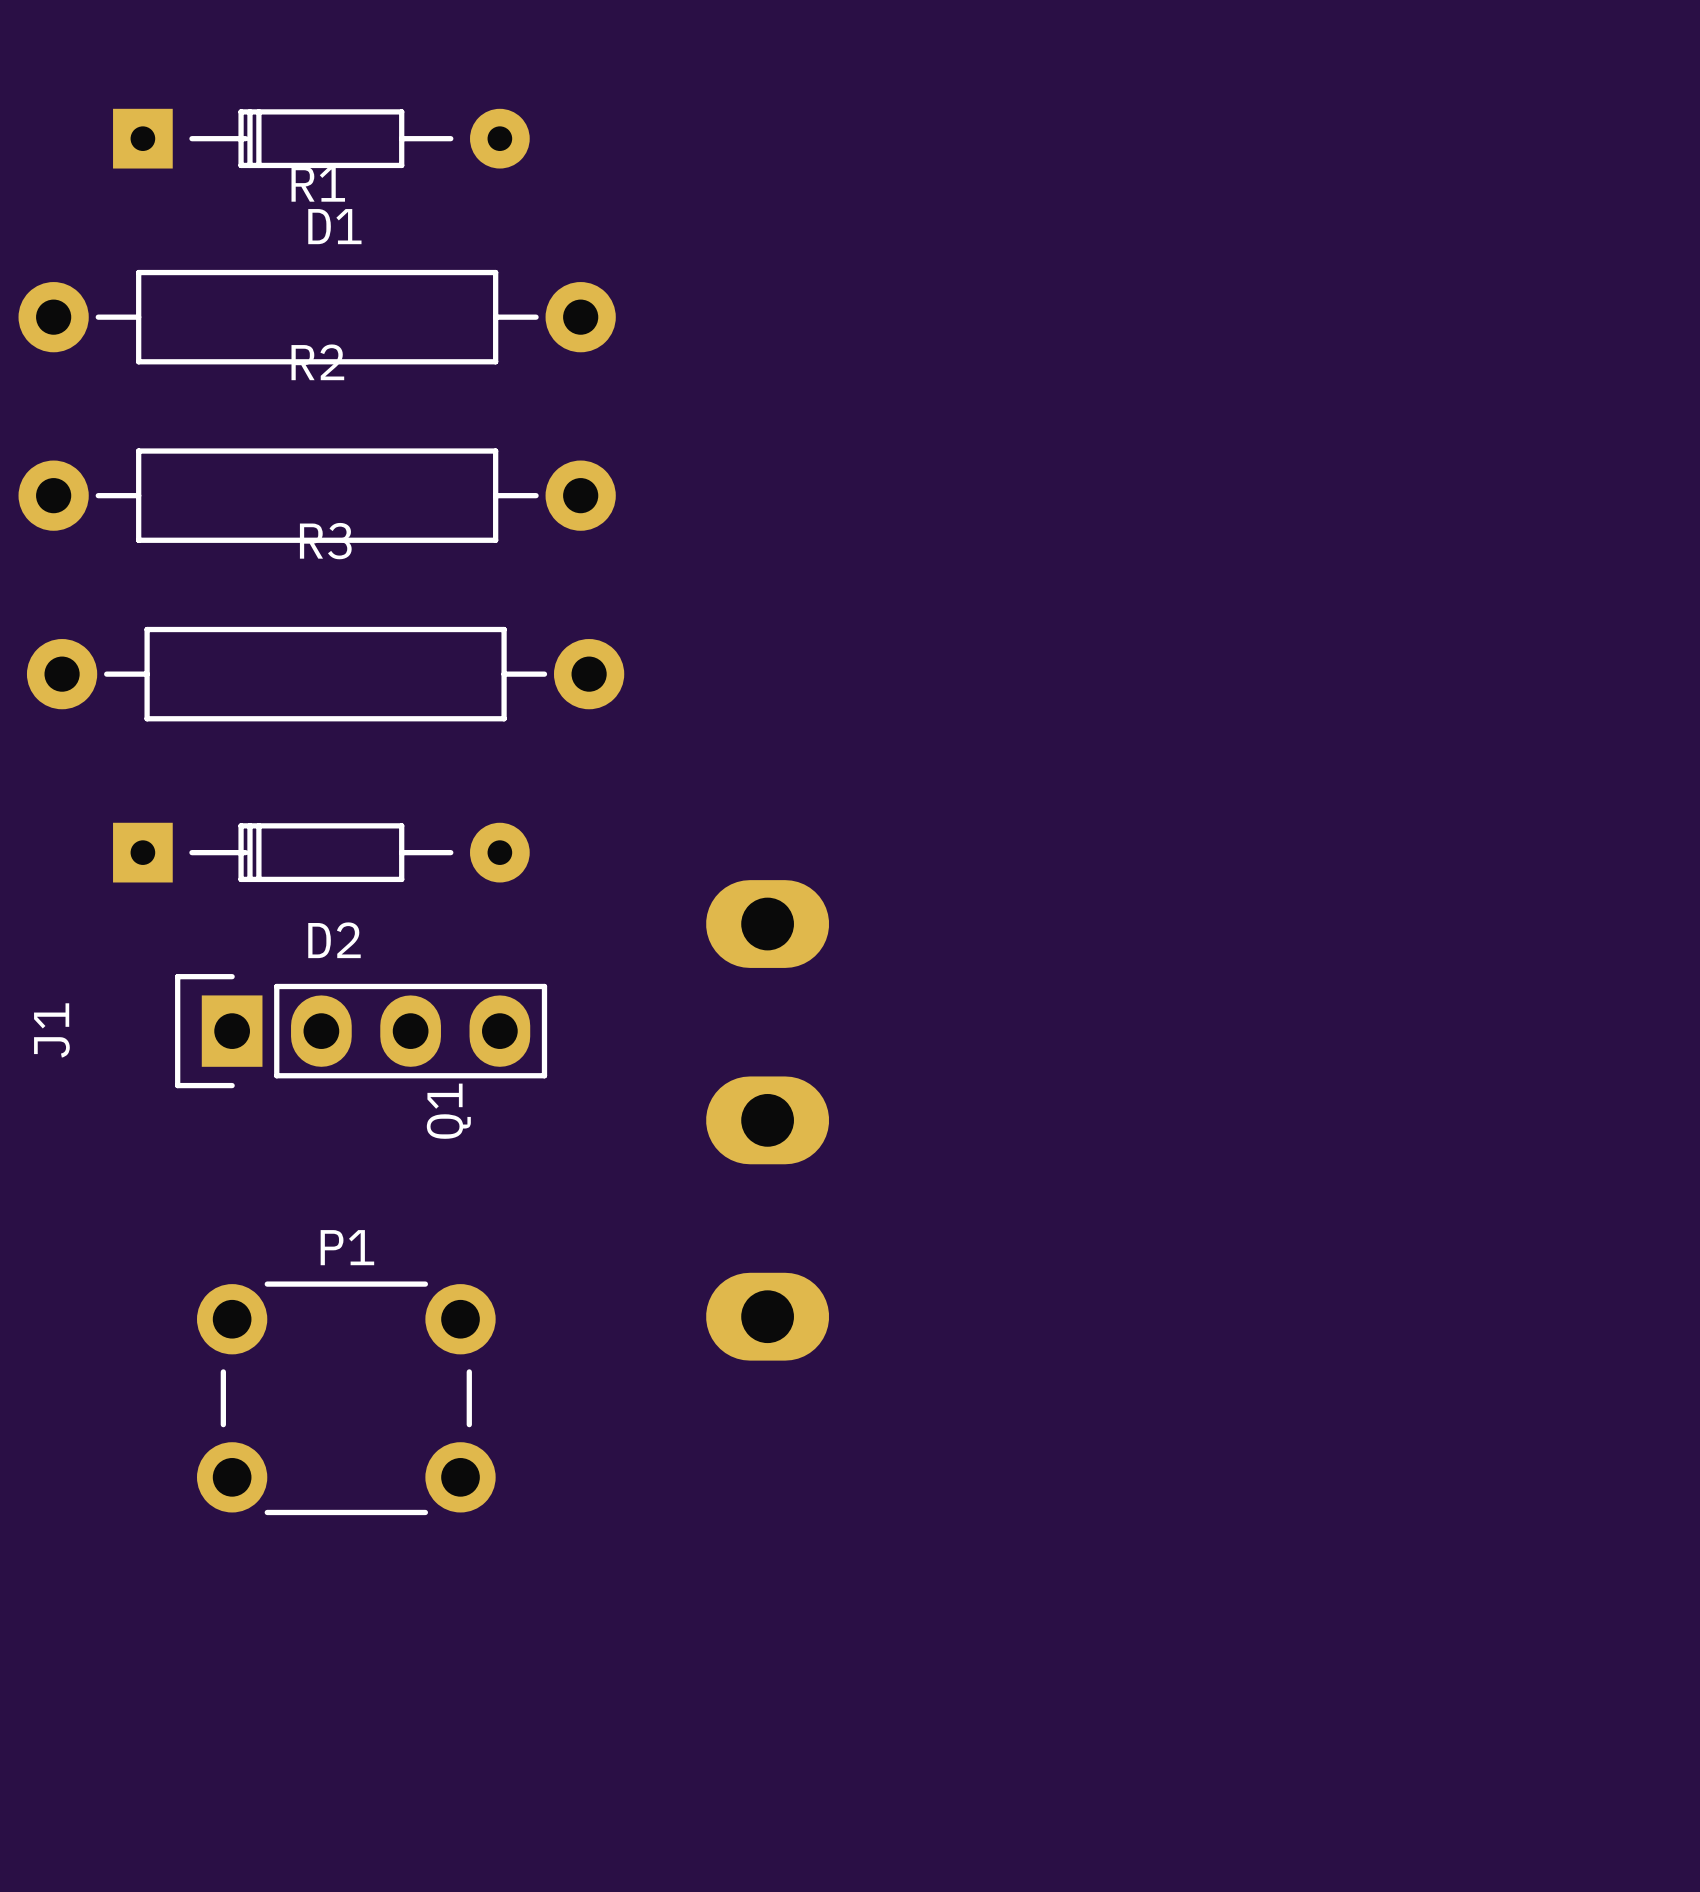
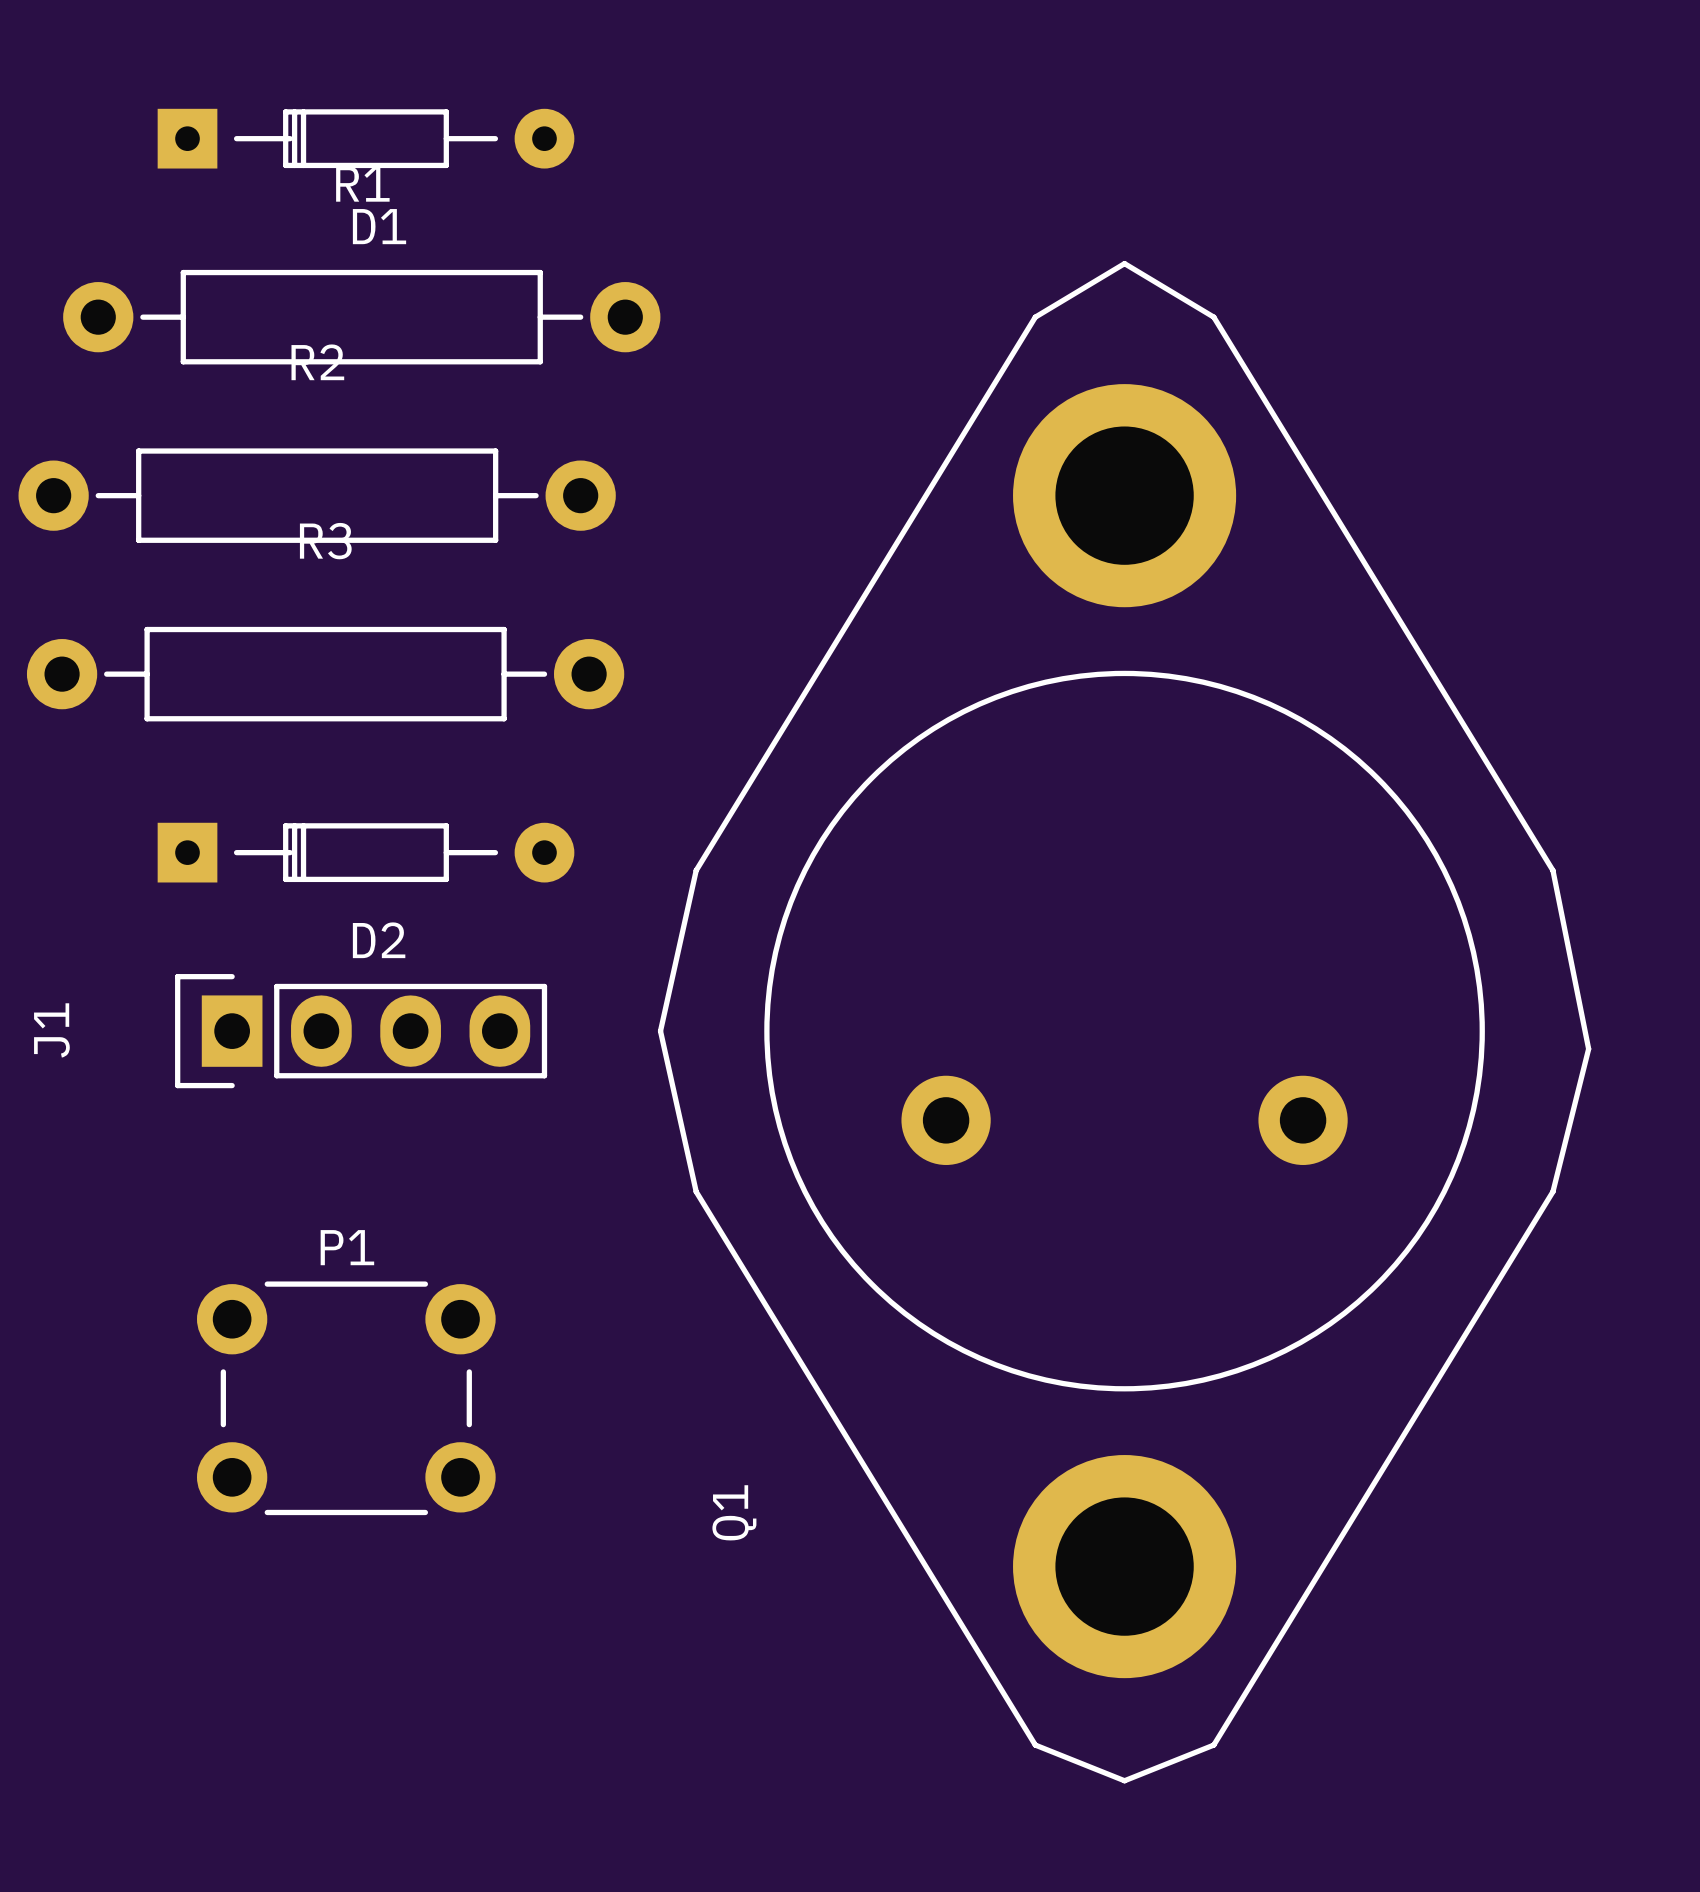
D1 position: (321, 138) -> (366, 138)
R1 position: (317, 317) -> (361, 317)
D2 position: (321, 852) -> (366, 852)
Q1 footprint: [706, 880, 830, 1361] -> [657, 260, 1592, 1784]
Q1 name position: Q1 (448, 1111) -> Q1 (734, 1512)

